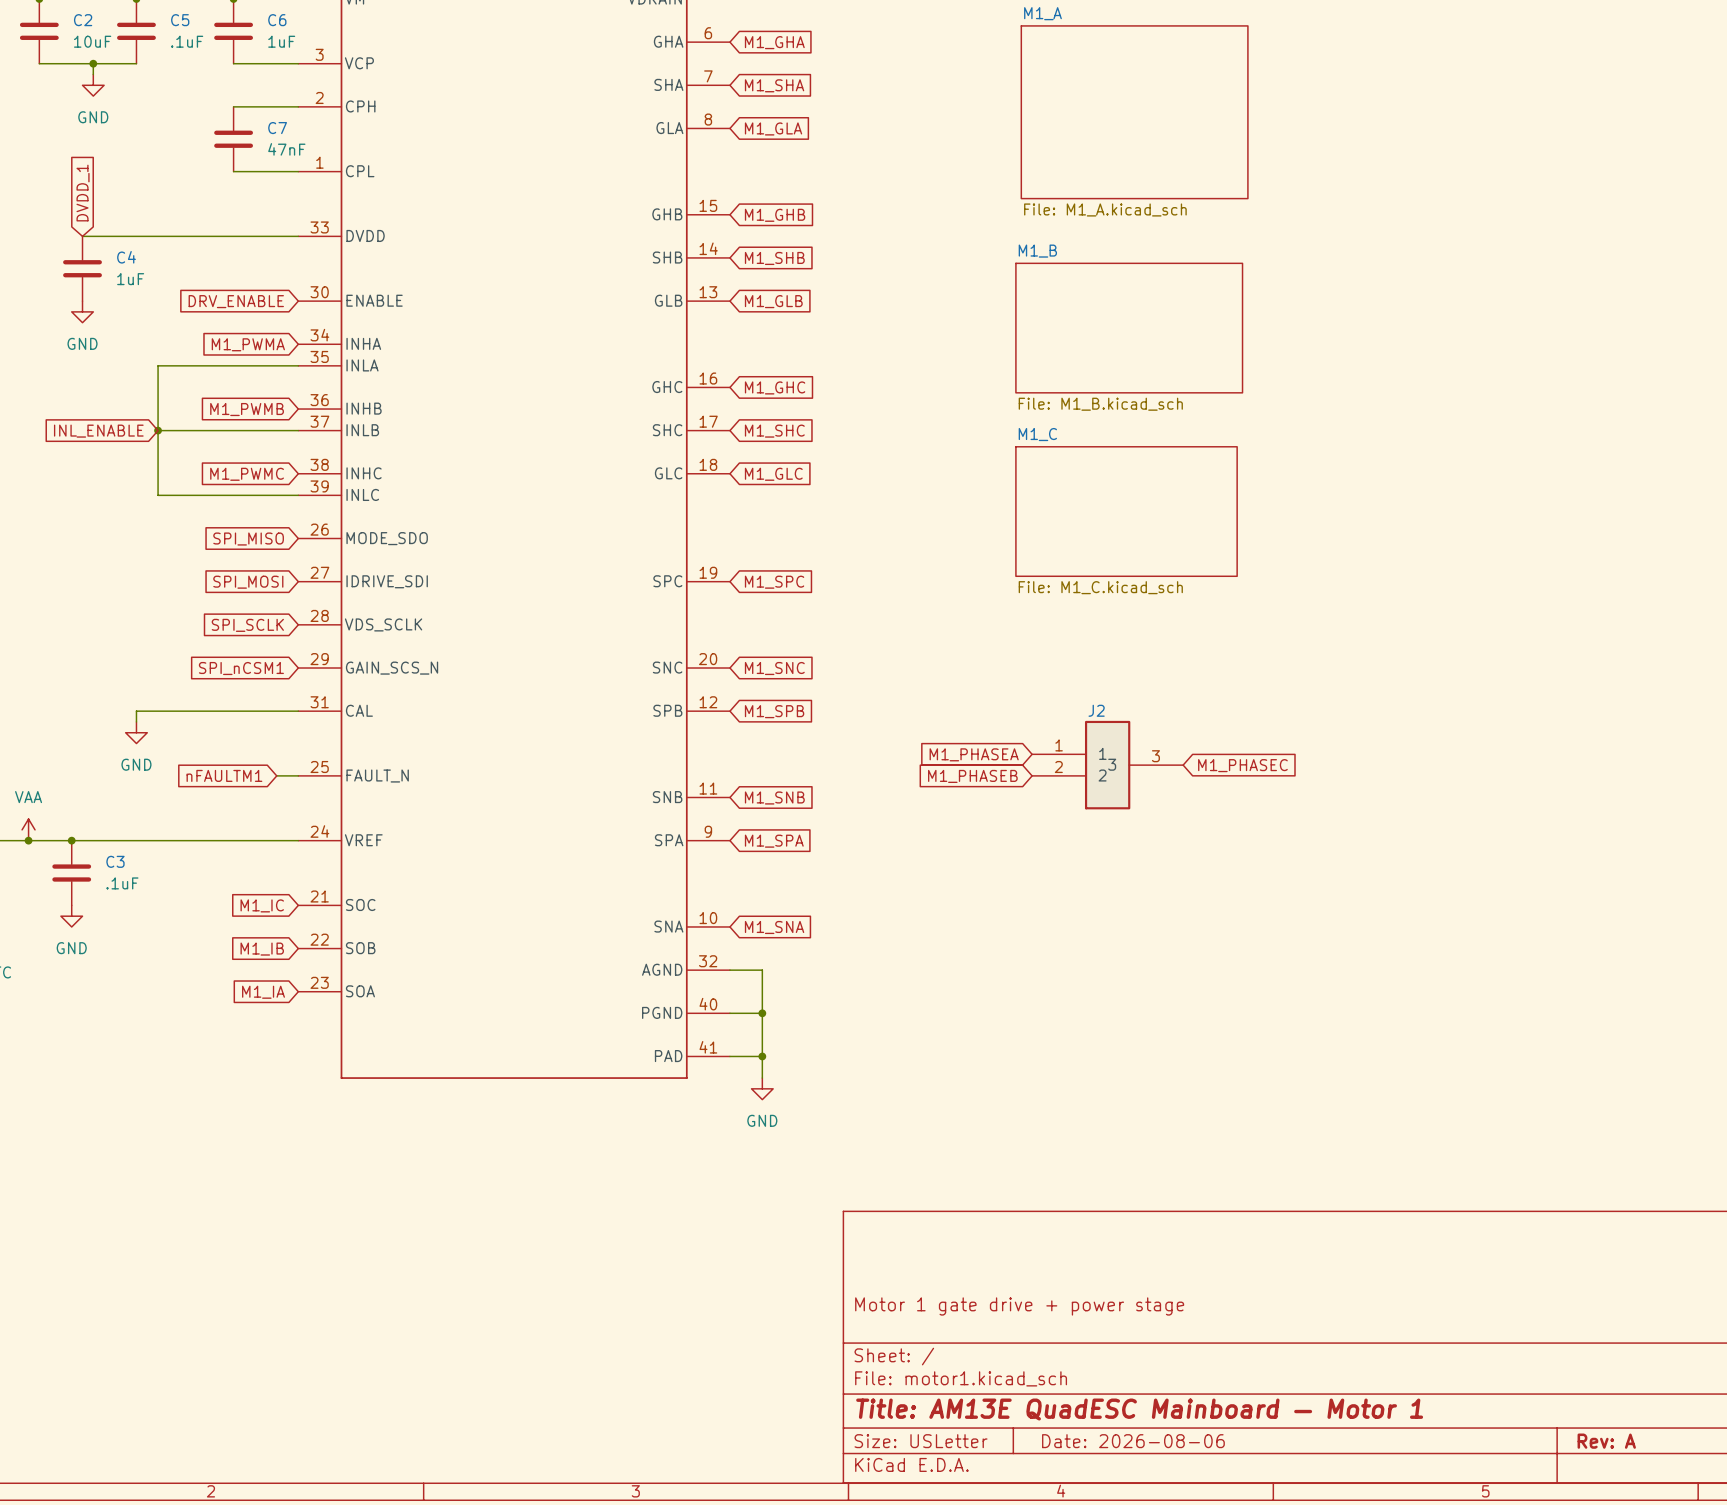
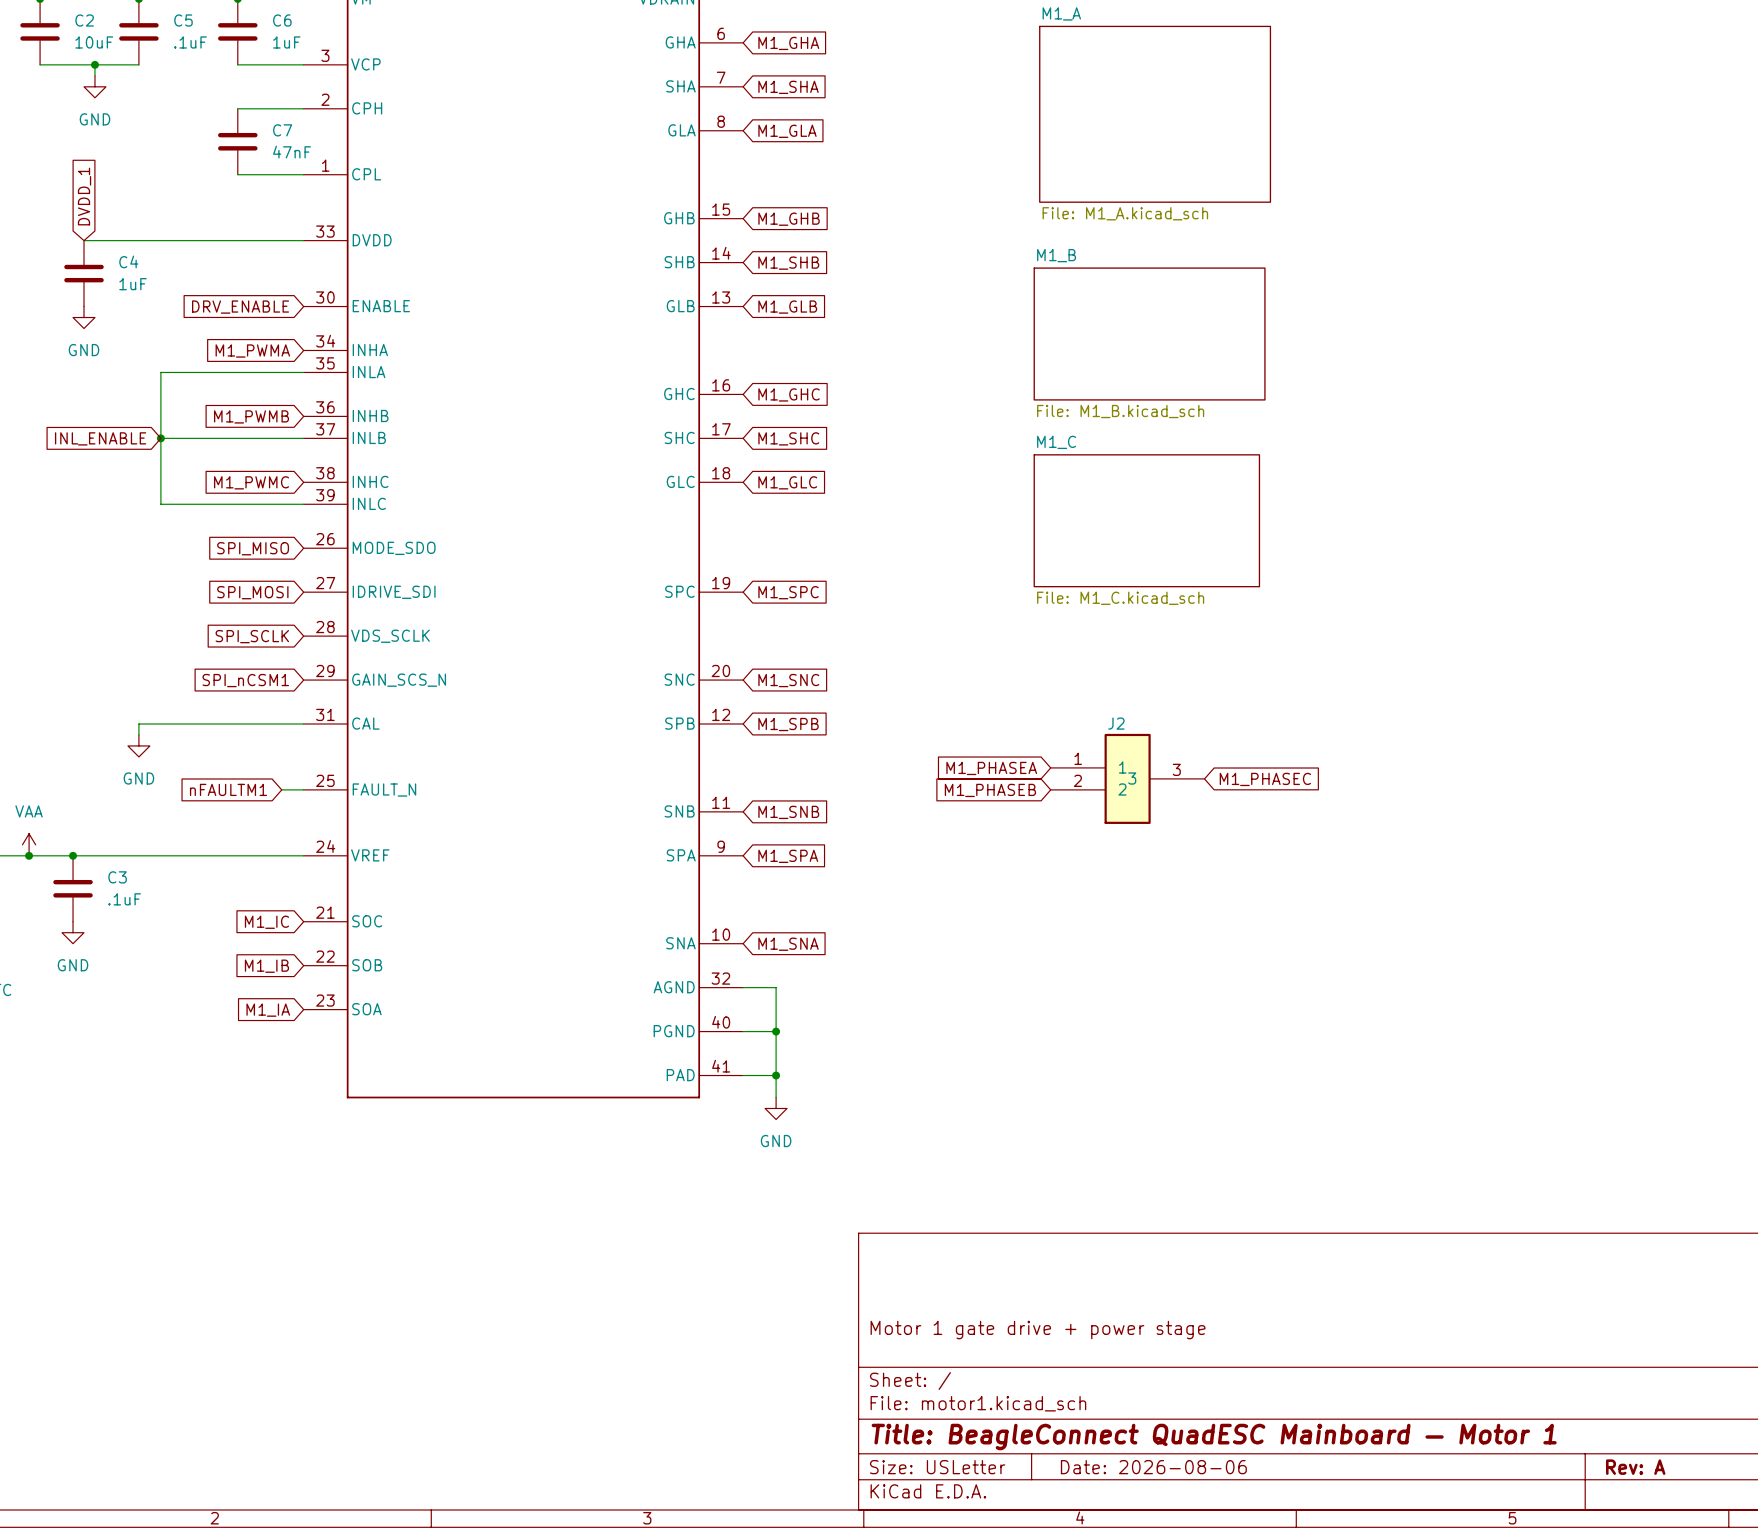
title block: Title: AM13E QuadESC Mainboard — Motor 1 (1139, 1409) -> Title: BeagleConnect QuadESC Mainboard — Motor 1 (1214, 1436)

